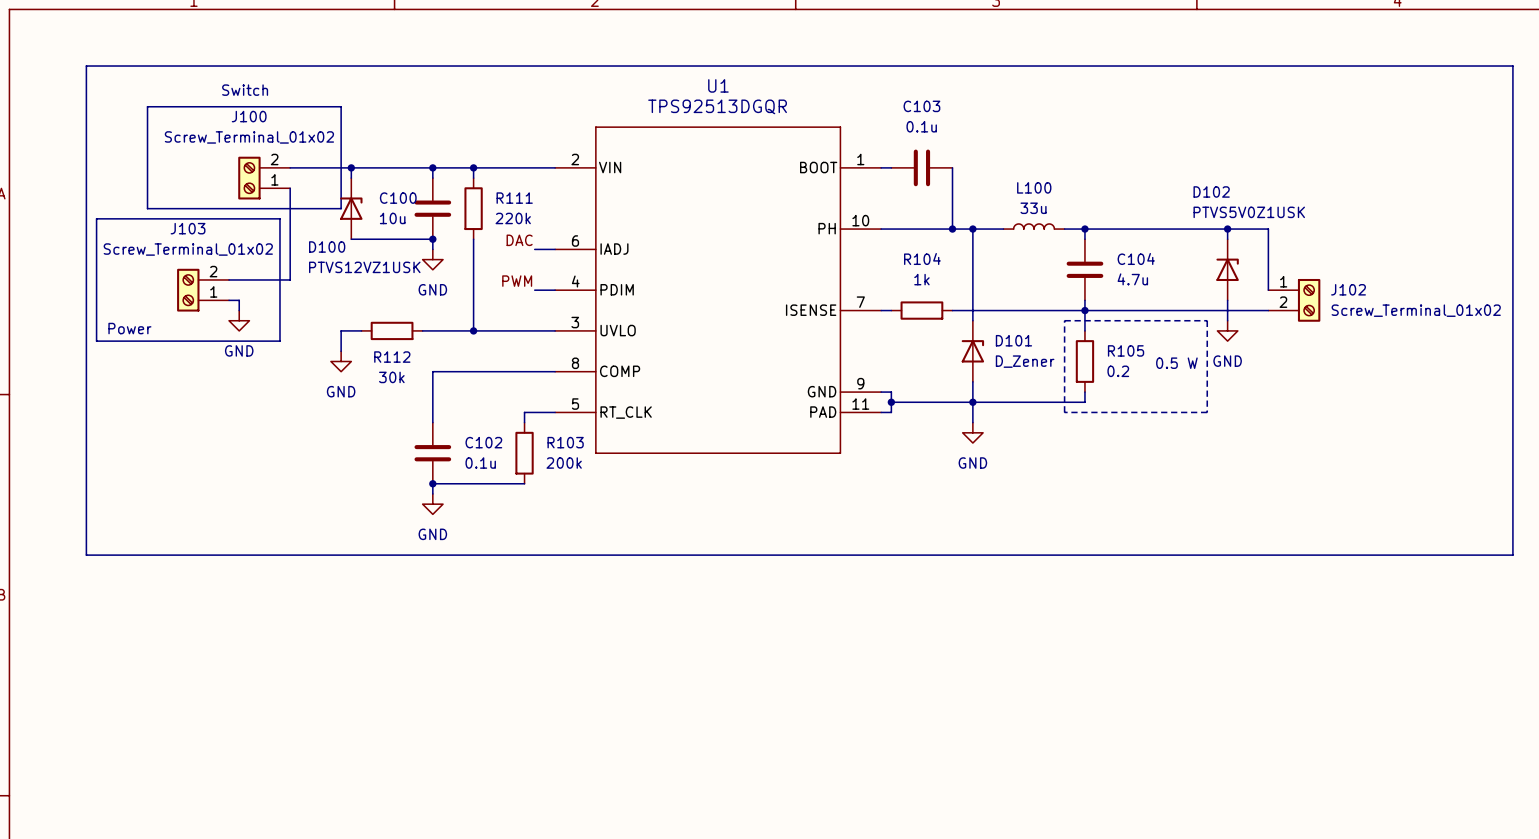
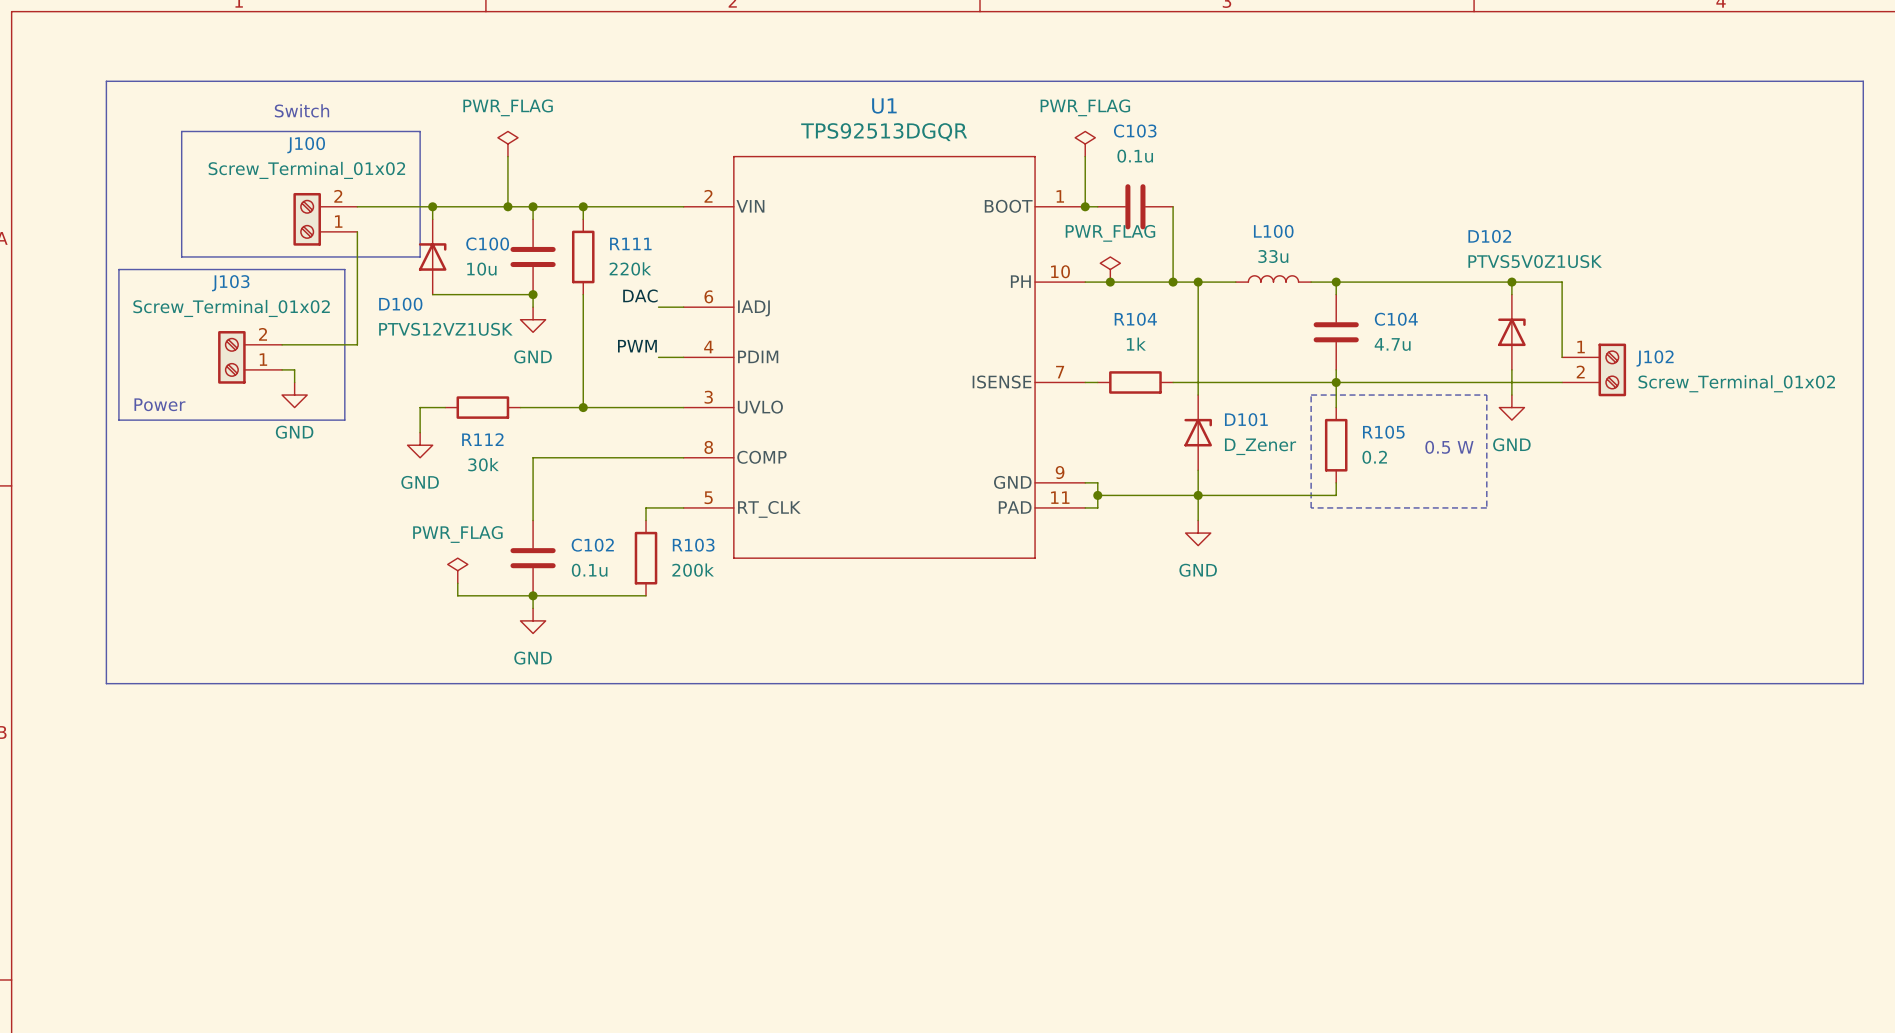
power symbol: none -> PWR_FLAG (507, 144)
power symbol: none -> PWR_FLAG (1085, 144)
wire: none -> (507, 156) (507, 206)
wire: none -> (1085, 156) (1085, 206)
junction: none -> (507, 206)
junction: none -> (1085, 206)
power symbol: none -> PWR_FLAG (1110, 269)
junction: none -> (1110, 282)
power symbol: none -> PWR_FLAG (457, 570)
wire: none -> (457, 583) (457, 595) (533, 595)

